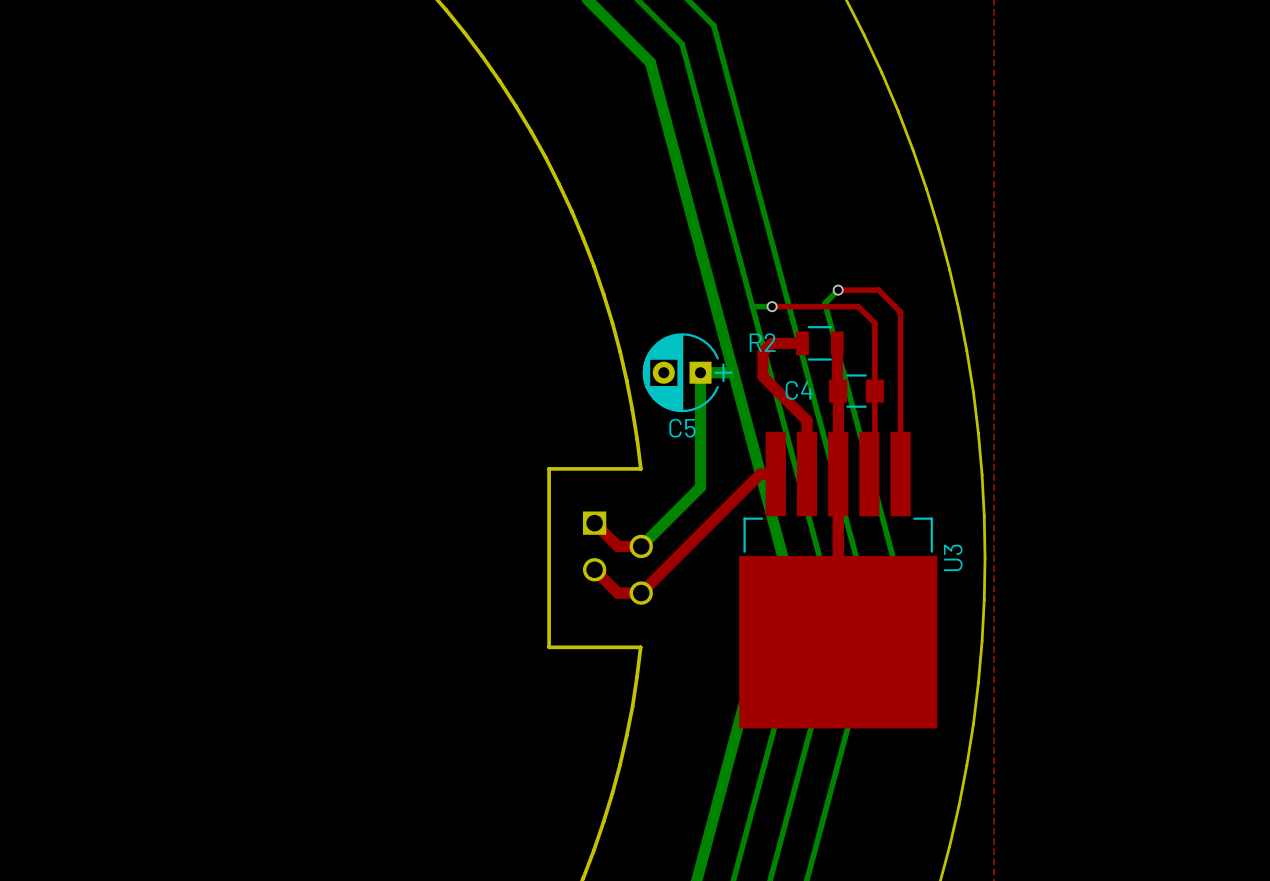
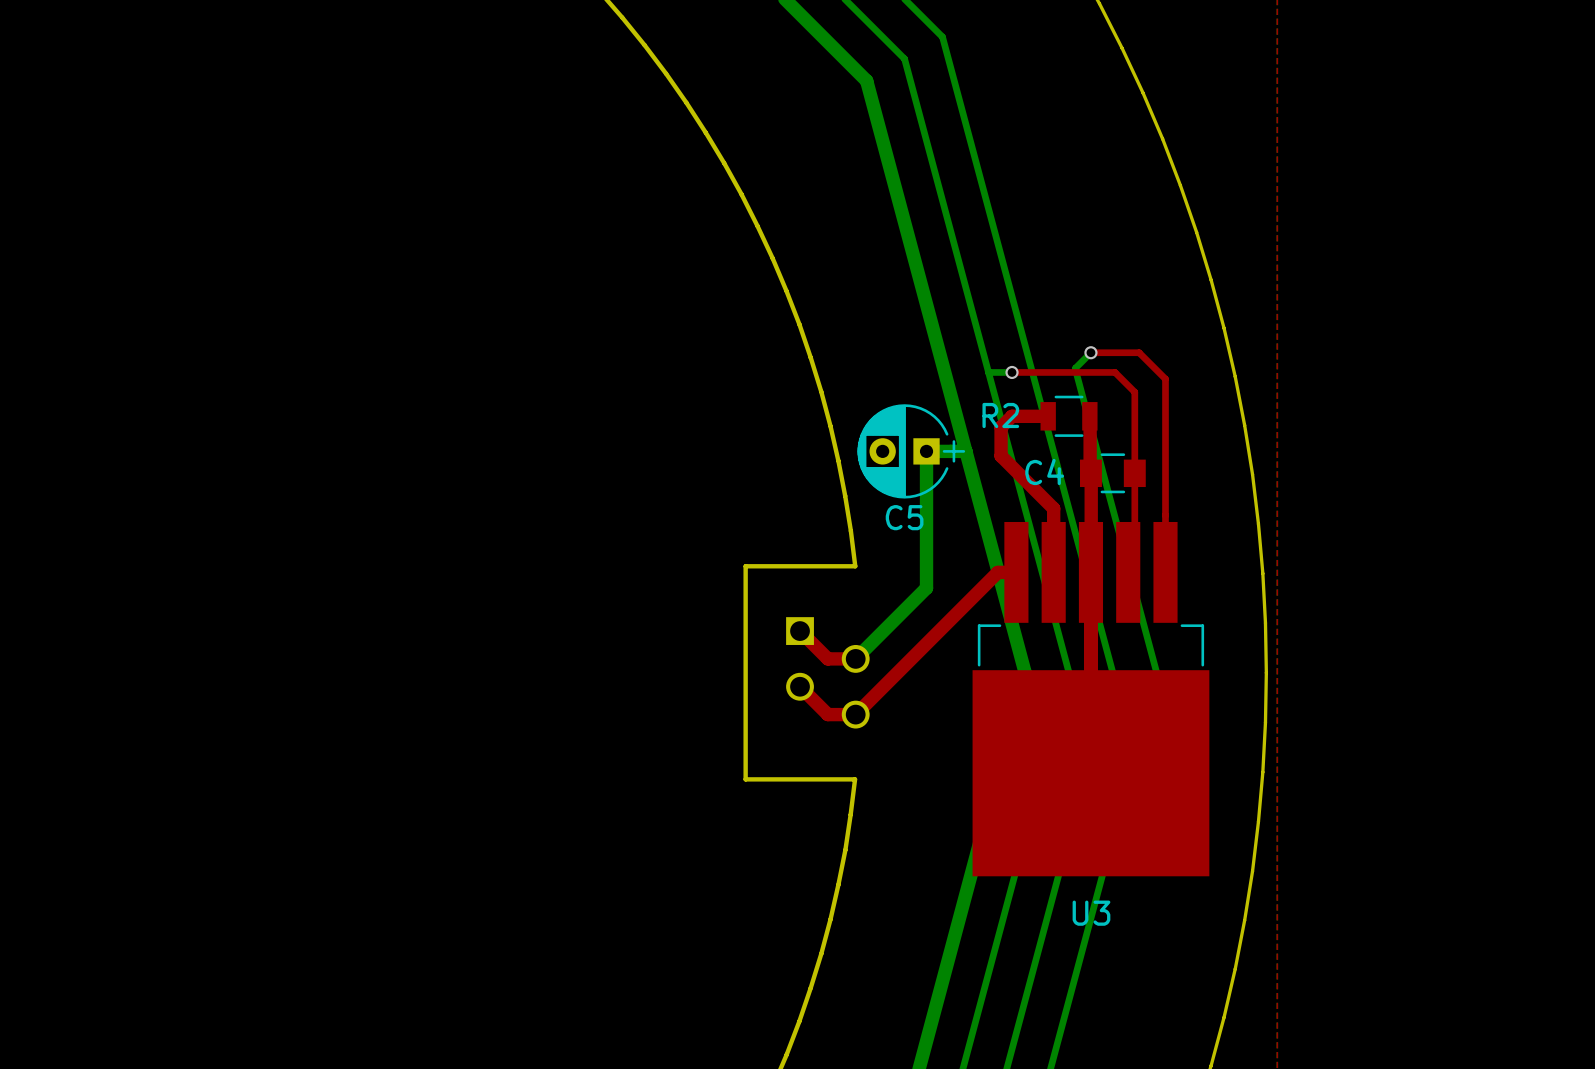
U3 name rotation: 0° (953, 557) -> 90° clockwise (1091, 913)
U3 name position: U3 (953, 557) -> U3 (1091, 913)

